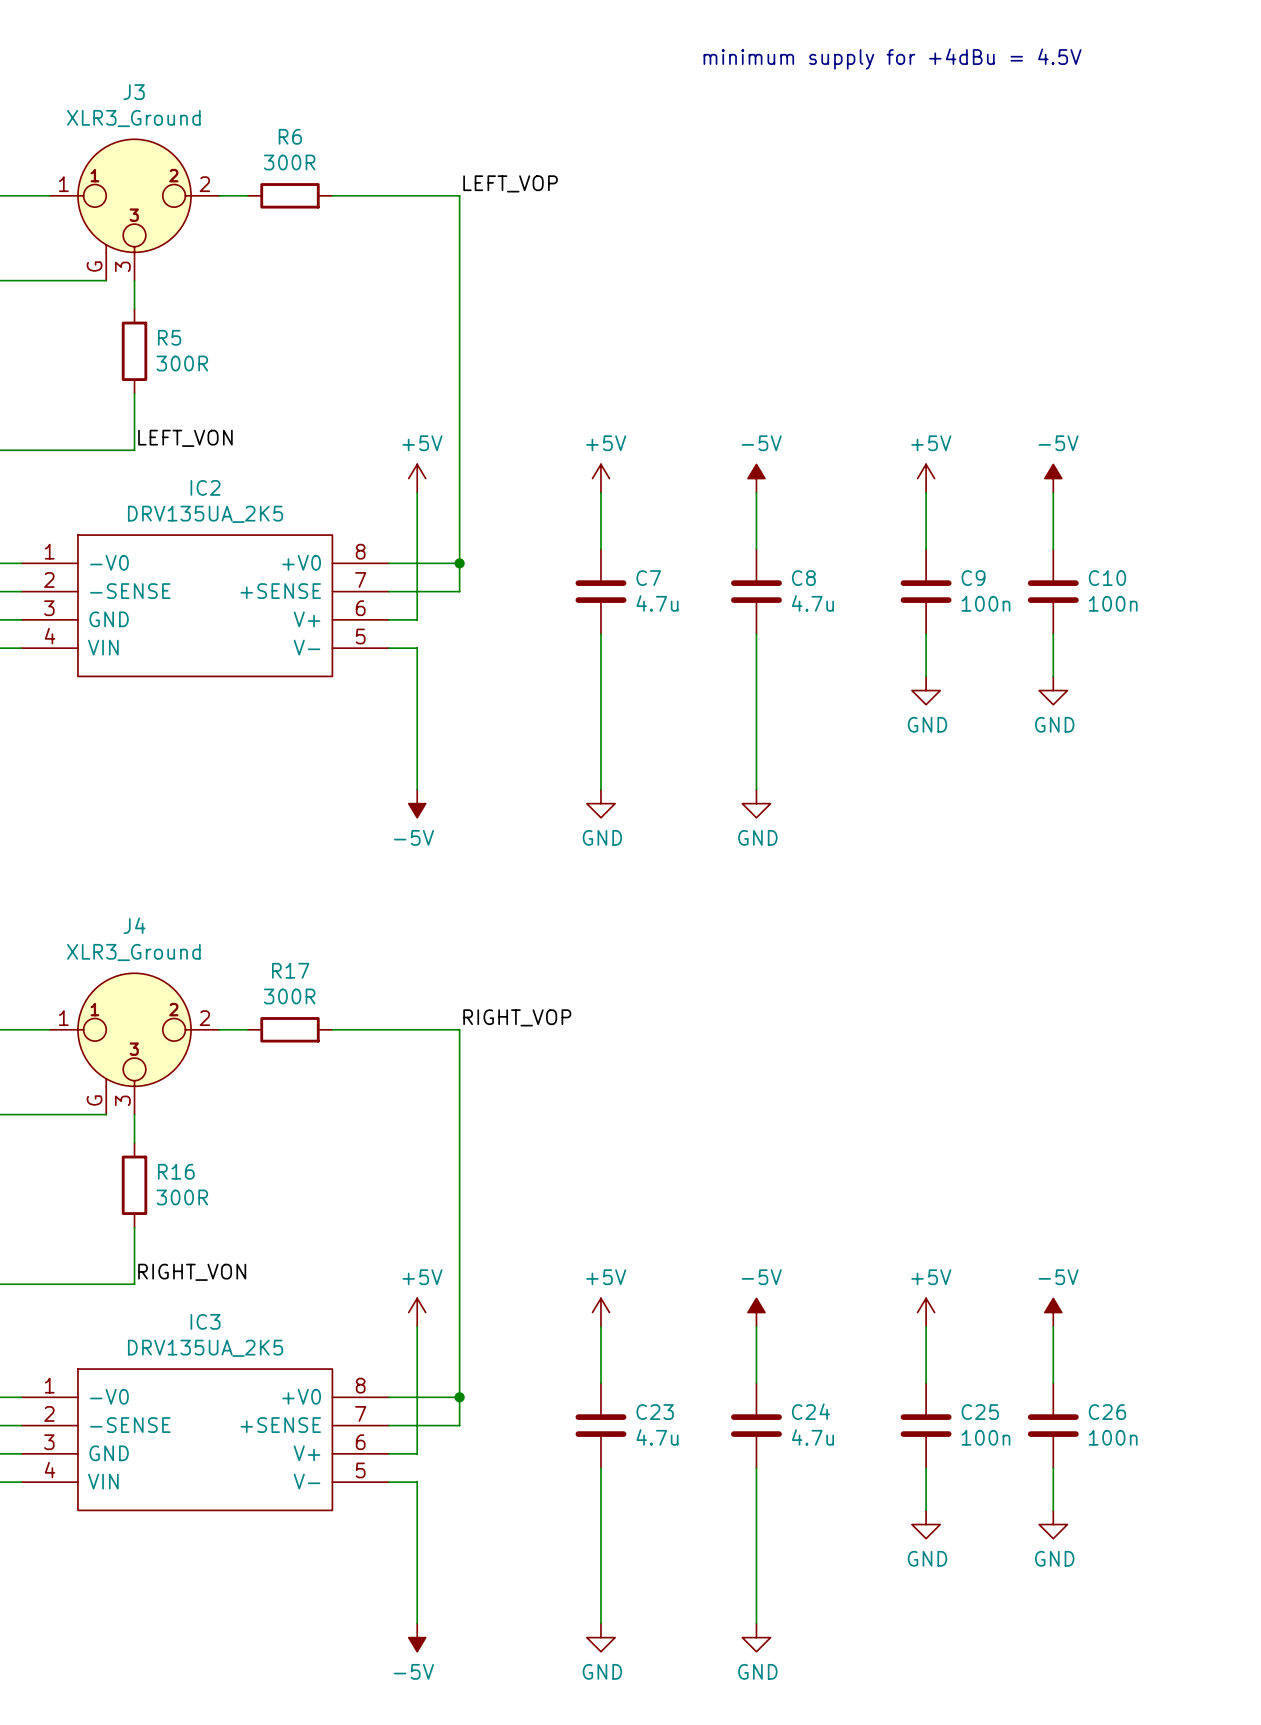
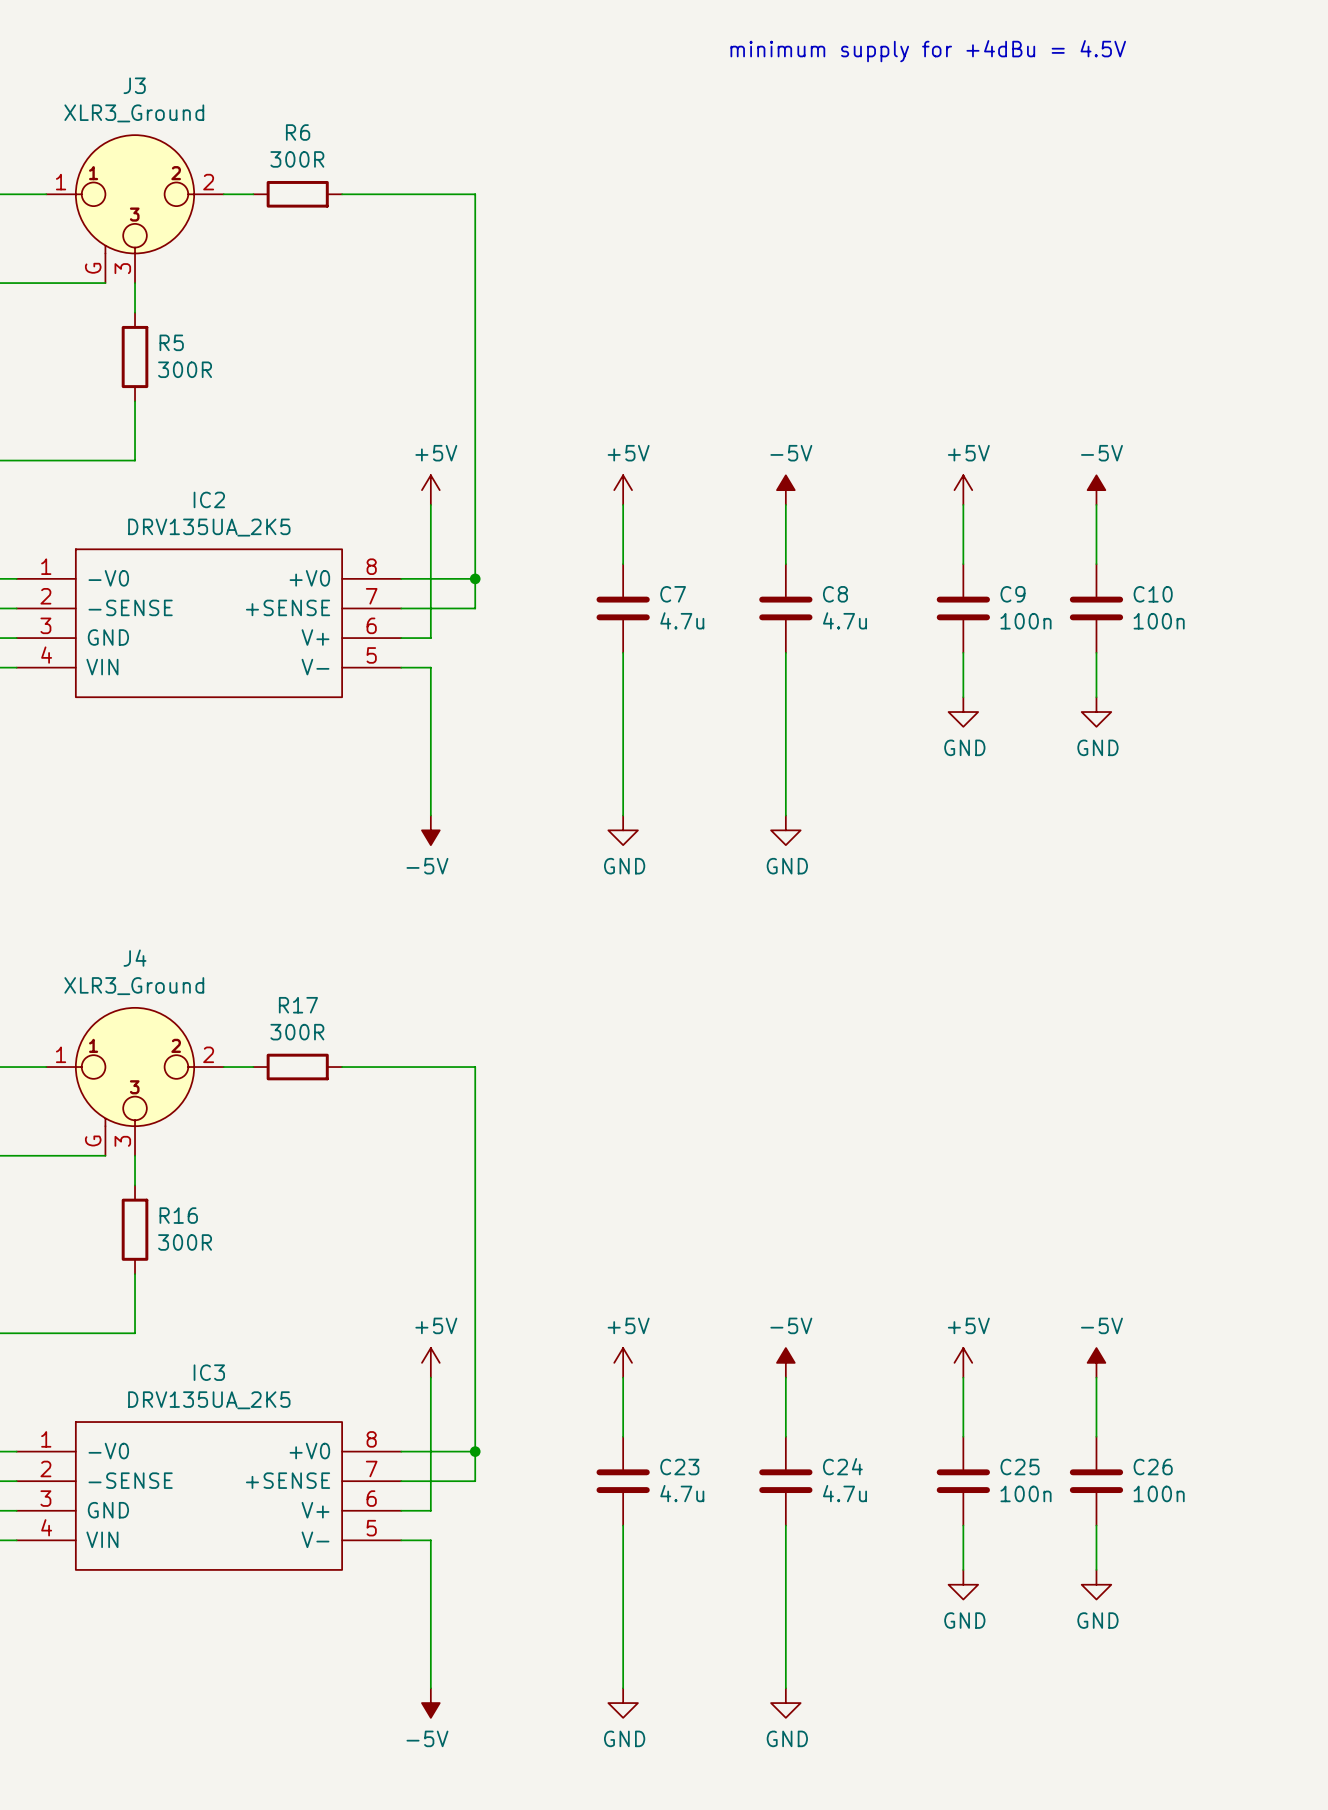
label: LEFT_VOP (510, 183) -> none
label: LEFT_VON (185, 438) -> none
label: RIGHT_VOP (517, 1017) -> none
label: RIGHT_VON (192, 1272) -> none

